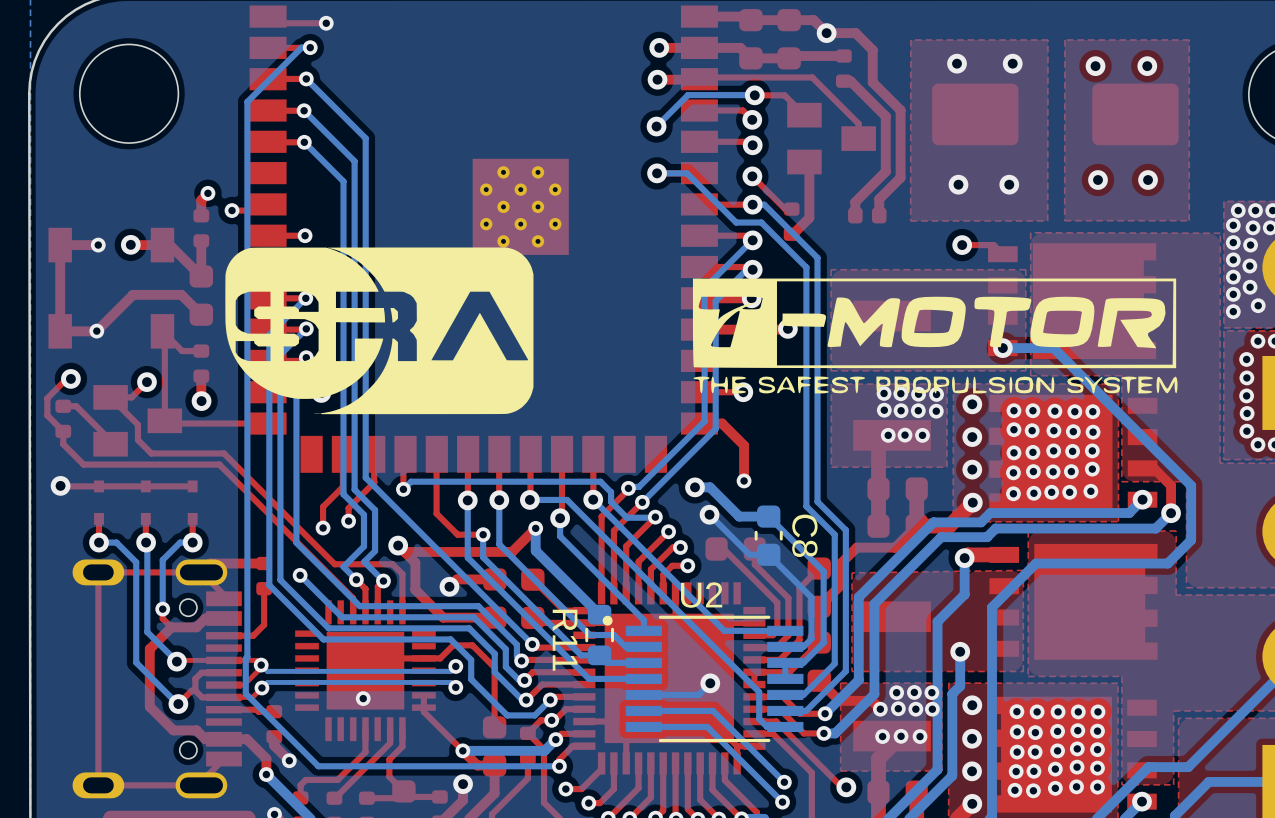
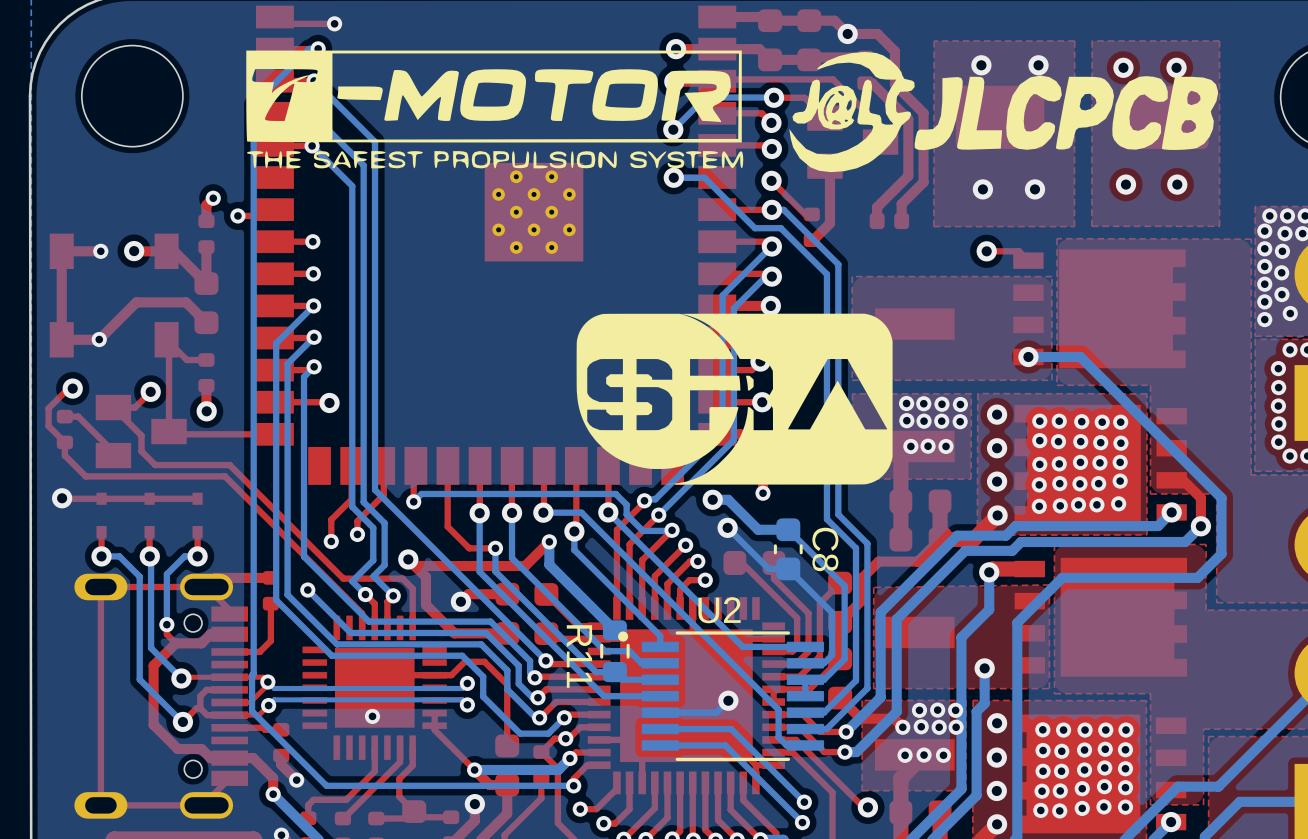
drawing: none -> [789, 51, 1219, 173]
drawing position: (379, 330) -> (734, 399)
drawing position: (935, 336) -> (494, 109)

